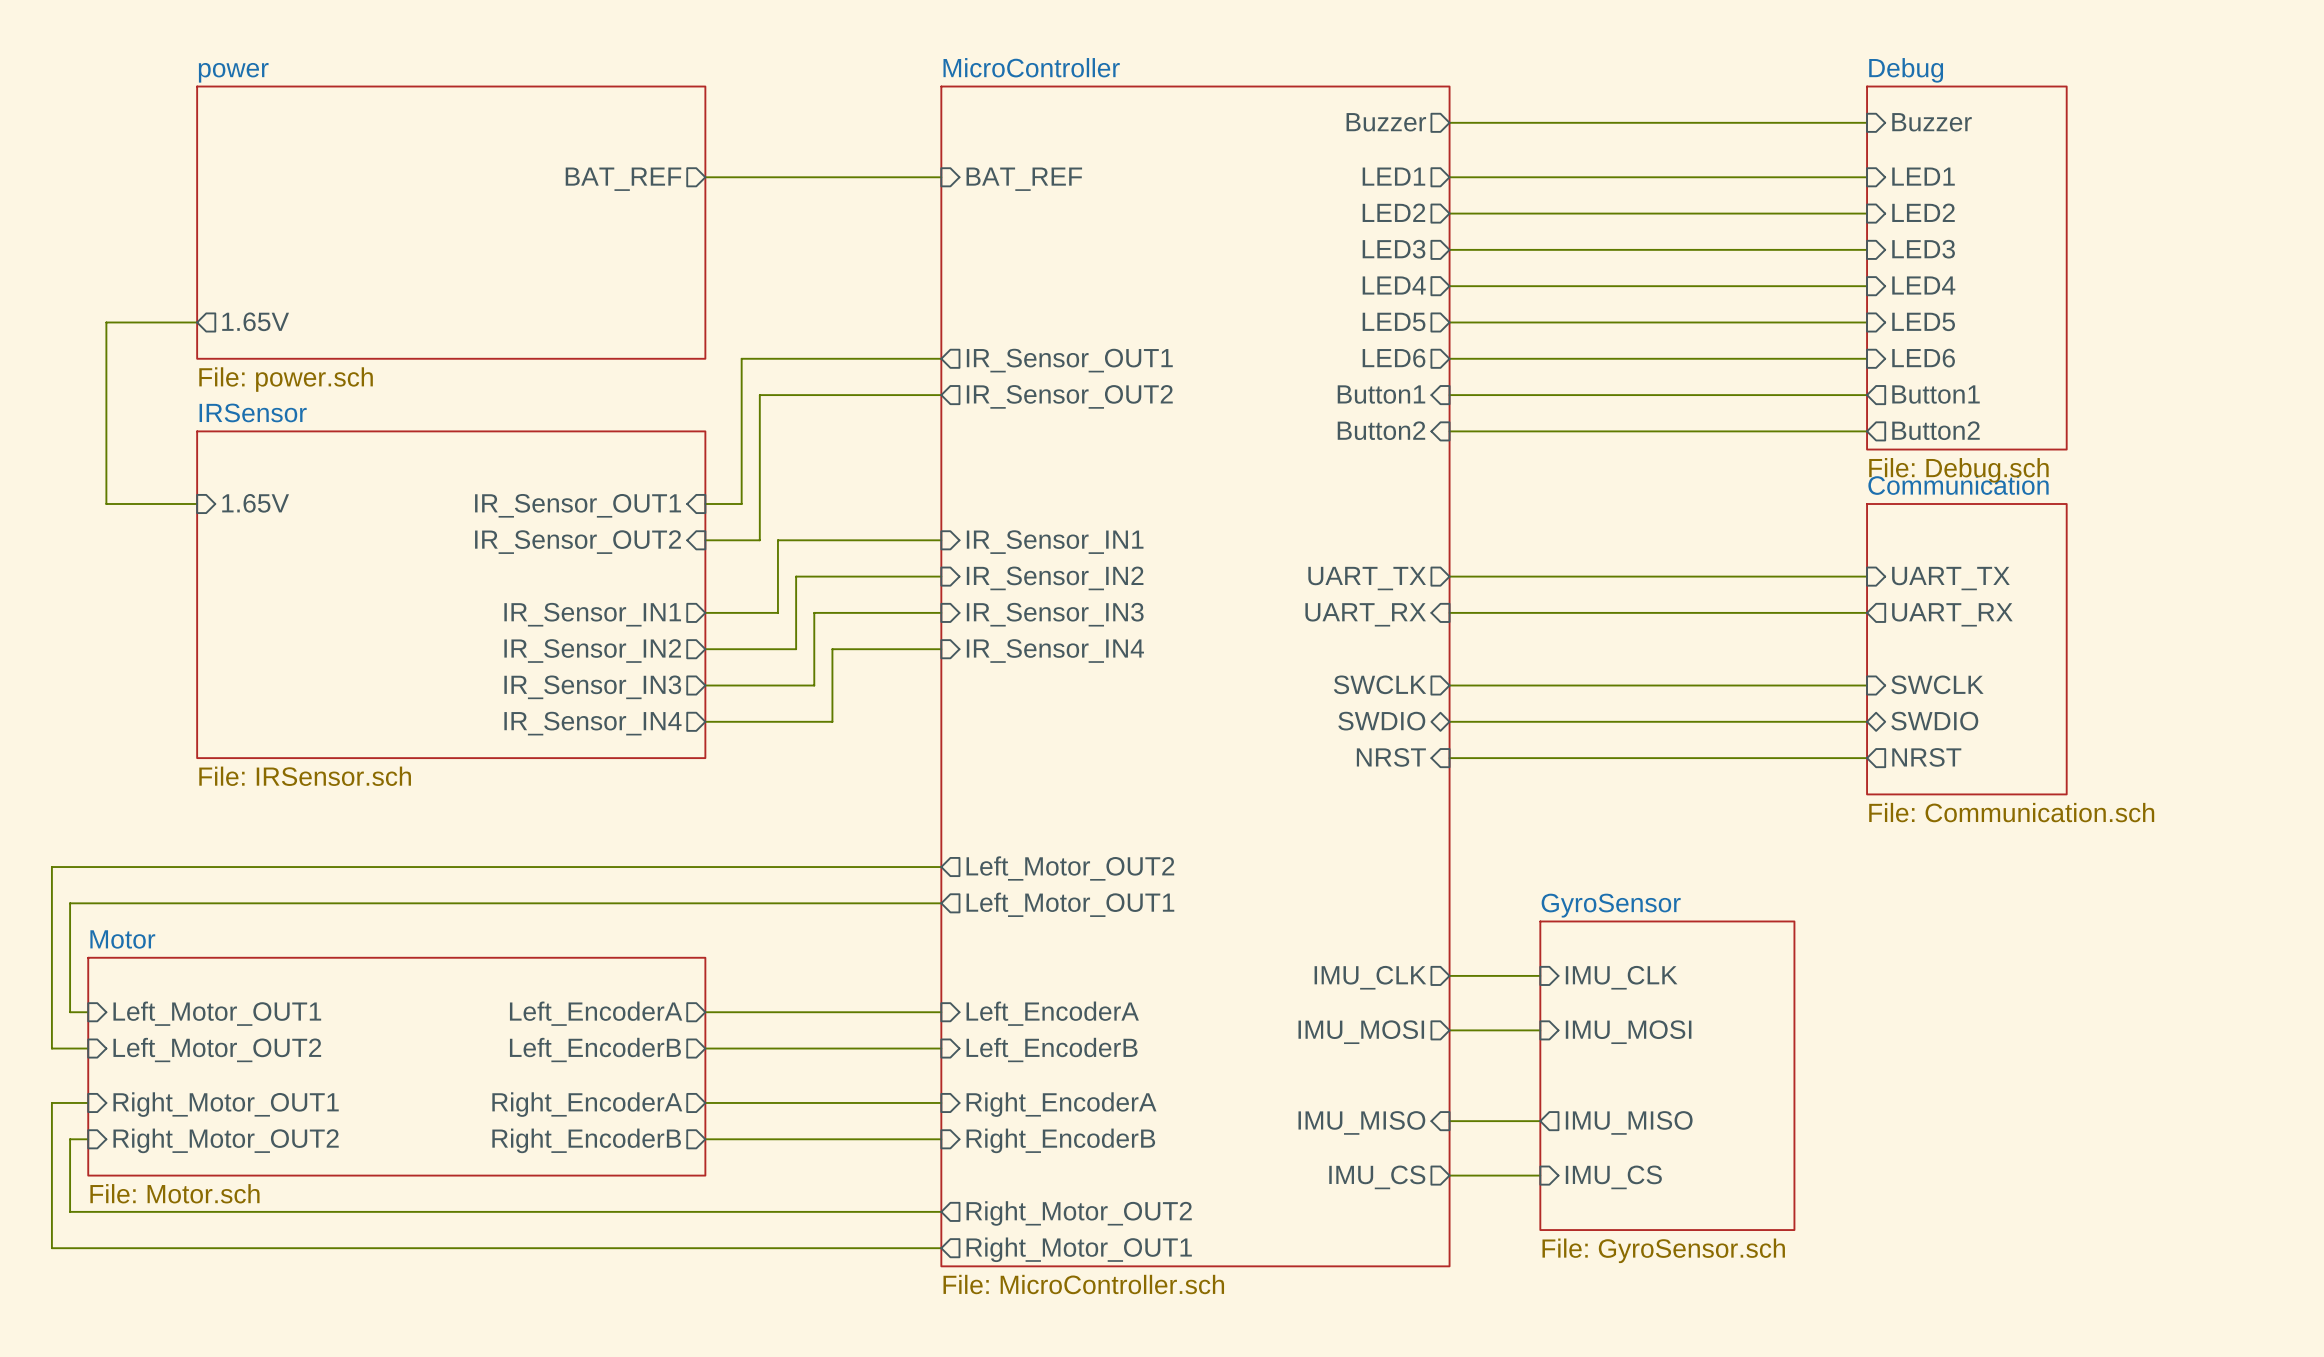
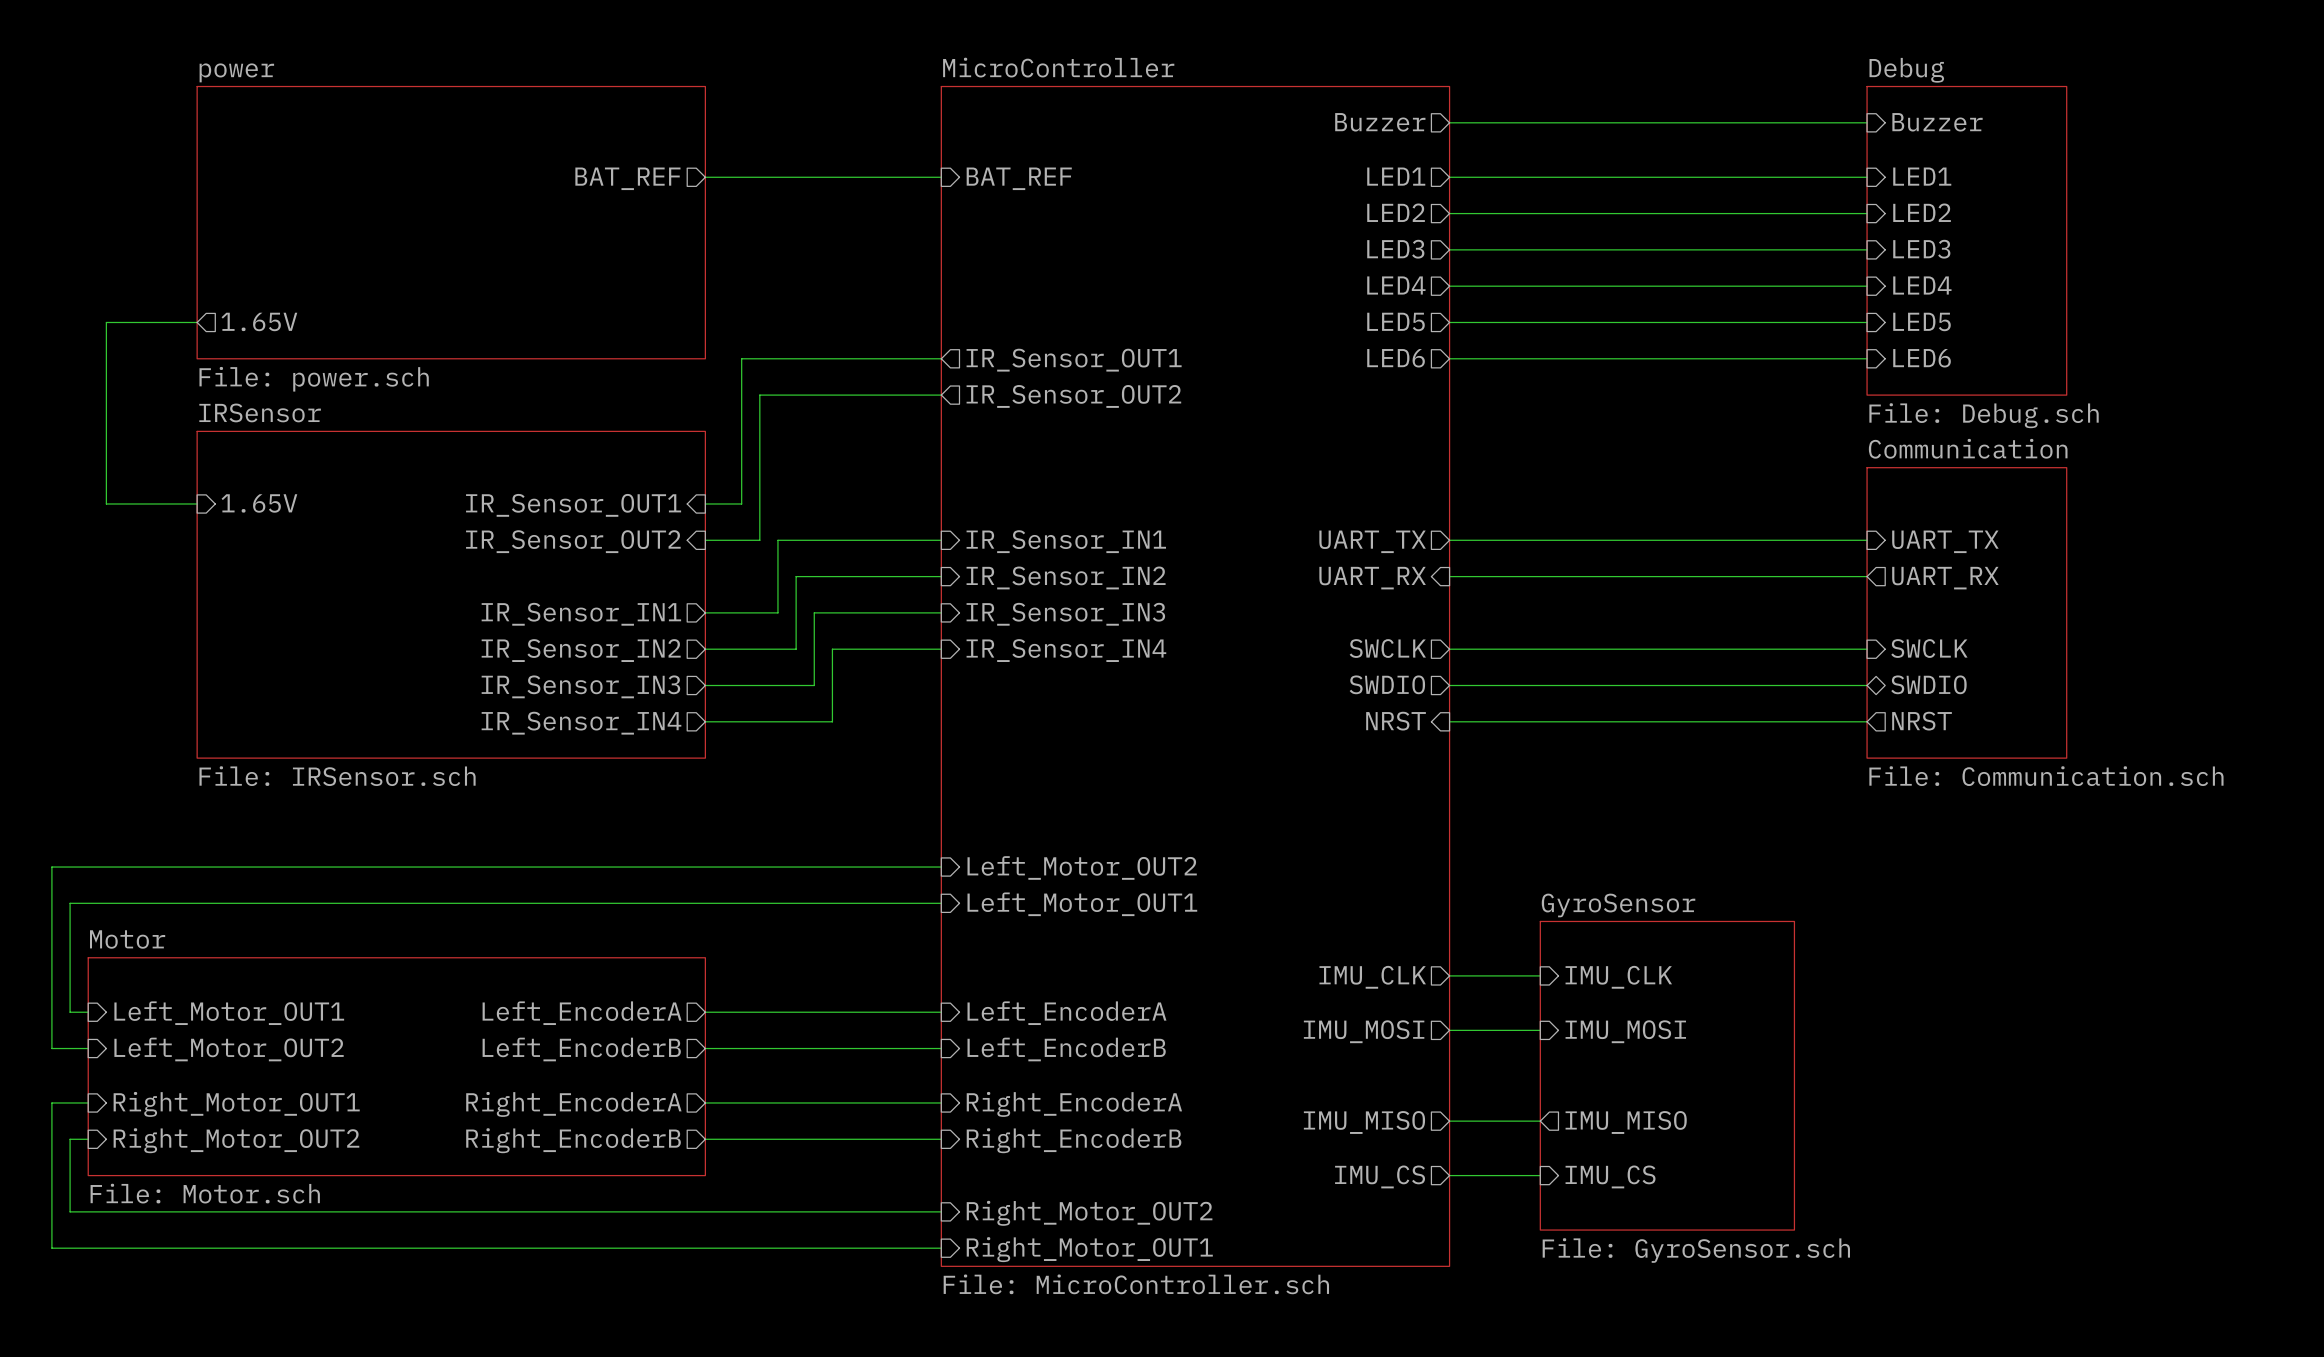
sheet Debug: none -> File: Debug.sch (1966, 240)
sheet Debug: File: Debug.sch (1966, 268) -> none
sheet pin: Button1 (1381, 394) -> none
sheet pin: Button1 (1936, 394) -> none
wire: (1449, 395) (1867, 395) -> none
sheet pin: Button2 (1381, 430) -> none
sheet pin: Button2 (1935, 430) -> none
wire: (1449, 431) (1867, 431) -> (1449, 540) (1867, 540)
sheet pin: none -> UART_TX (1372, 541)
sheet pin: none -> UART_TX (1945, 541)
sheet pin shape: output (1367, 578) -> input (1372, 578)
sheet pin: UART_TX (1367, 578) -> UART_RX (1372, 578)
sheet pin shape: input (1950, 578) -> output (1945, 578)
sheet pin: UART_TX (1950, 578) -> UART_RX (1945, 578)
wire: (1449, 612) (1867, 612) -> (1449, 649) (1867, 649)
sheet pin: UART_RX (1365, 614) -> none
sheet pin: UART_RX (1952, 614) -> none
sheet pin: none -> SWCLK (1387, 648)
sheet pin: none -> SWCLK (1929, 648)
sheet Communication position: (1966, 649) -> (1966, 612)
sheet pin: SWCLK (1380, 684) -> SWDIO (1387, 684)
sheet pin shape: input (1937, 684) -> bidirectional (1928, 684)
sheet pin: SWCLK (1937, 684) -> SWDIO (1928, 684)
sheet pin shape: bidirectional (1381, 721) -> input (1396, 721)
sheet pin: SWDIO (1381, 721) -> NRST (1396, 721)
sheet pin shape: bidirectional (1934, 721) -> output (1922, 721)
sheet pin: SWDIO (1934, 721) -> NRST (1922, 721)
sheet pin: NRST (1391, 757) -> none
sheet pin: NRST (1926, 757) -> none
wire: (1449, 758) (1867, 758) -> none
sheet pin shape: output (1070, 868) -> input (1082, 867)
sheet pin shape: output (1070, 904) -> input (1082, 904)
sheet pin shape: input (1361, 1122) -> output (1364, 1122)
sheet pin shape: output (1079, 1213) -> input (1089, 1213)
sheet pin shape: output (1079, 1249) -> input (1089, 1249)

